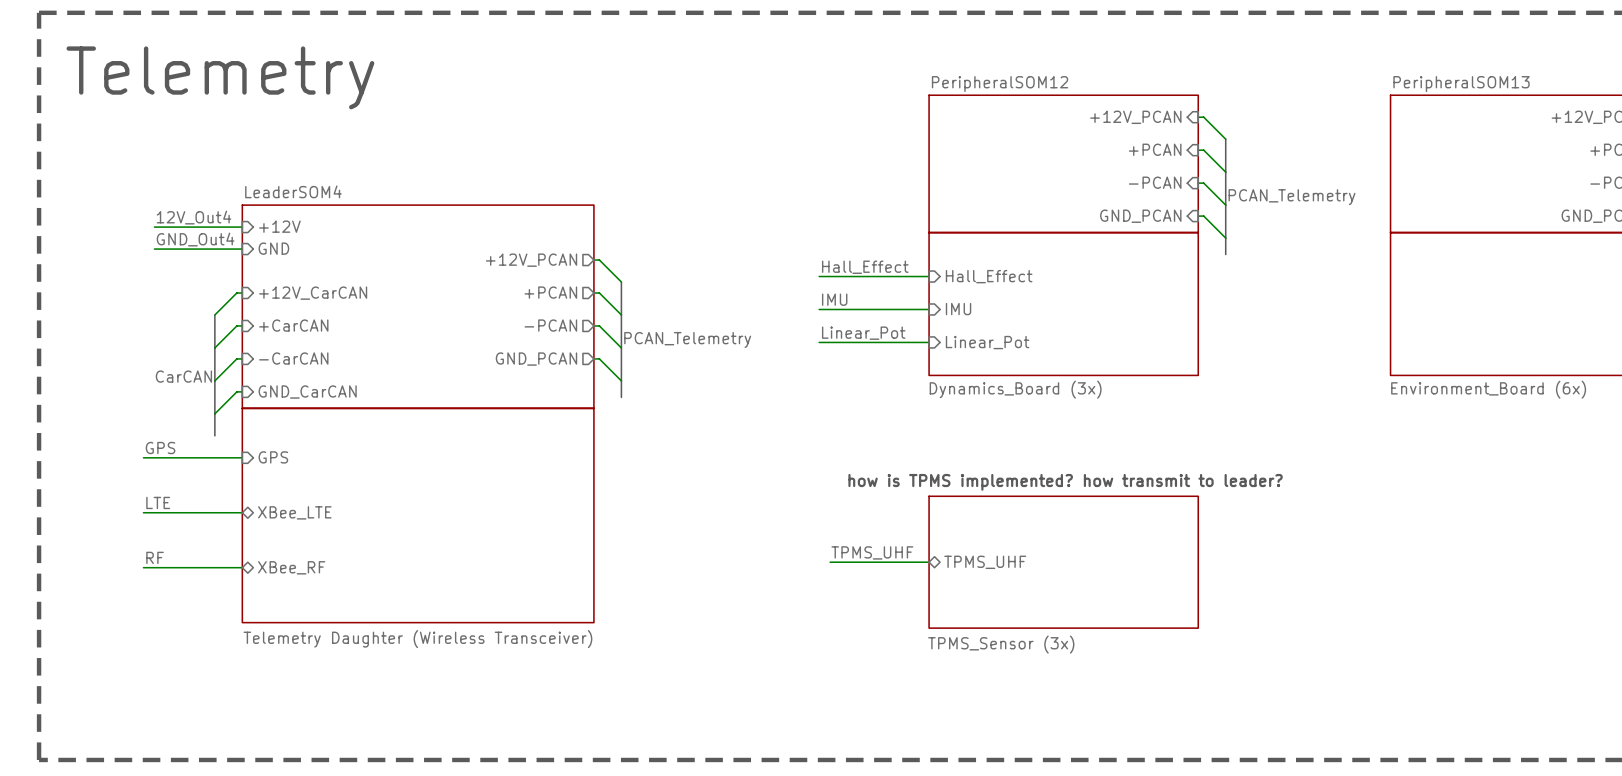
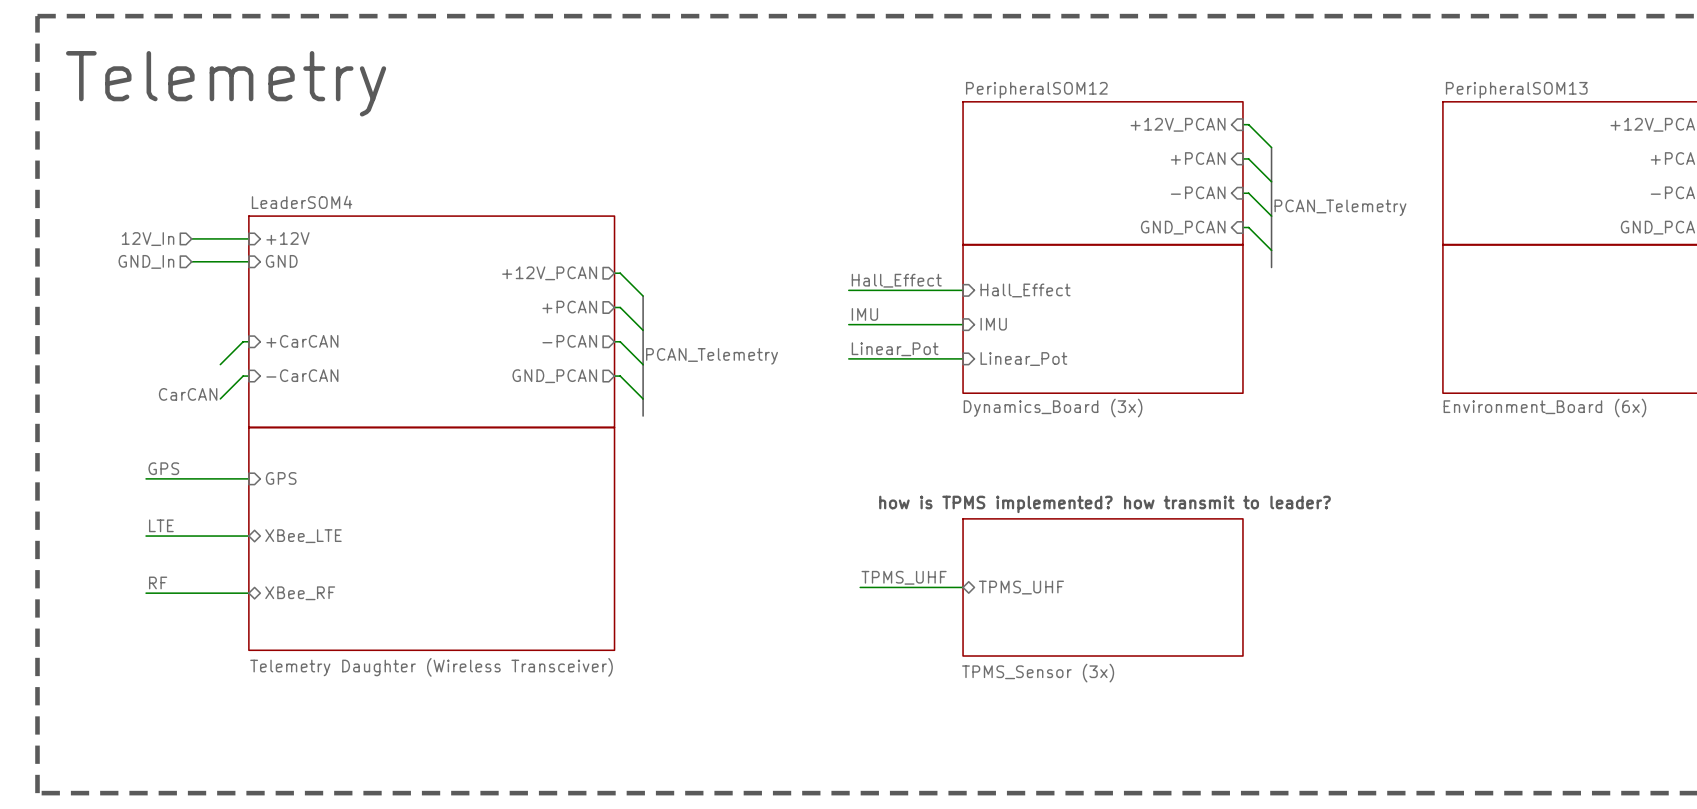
label: 12V_Out4 (194, 217) -> none
hierarchical label: none -> 12V_In (148, 239)
wire: (154, 227) (187, 227) -> none
label: GND_Out4 (195, 239) -> none
hierarchical label: none -> GND_In (146, 261)
wire: (154, 249) (187, 249) -> none
wire: (242, 293) (236, 293) (214, 314) -> none
sheet pin: +12V_CarCAN (313, 293) -> none
bus: (214, 314) (214, 435) -> none
wire: (242, 391) (236, 391) (214, 413) -> none
sheet pin: GND_CarCAN (307, 392) -> none

